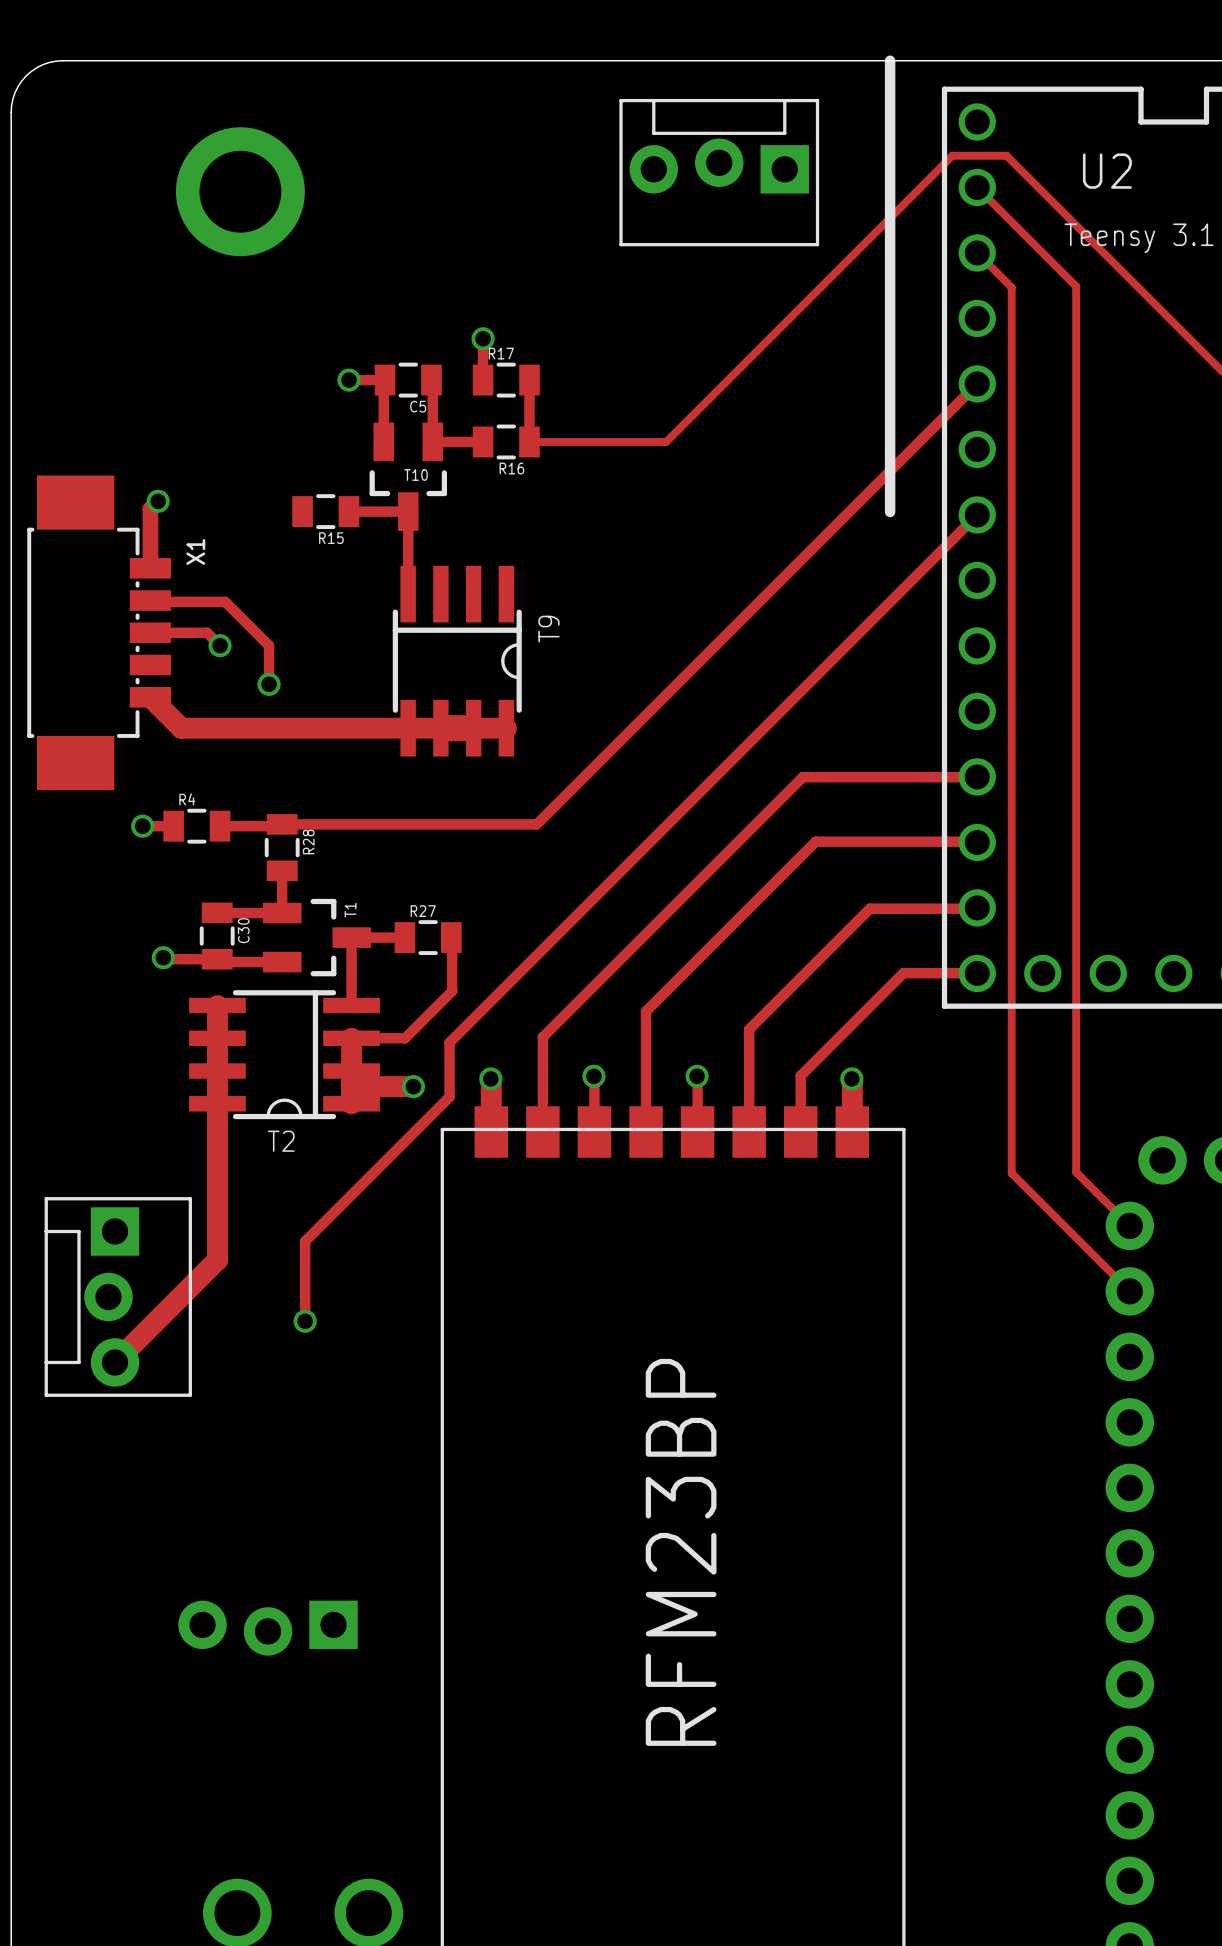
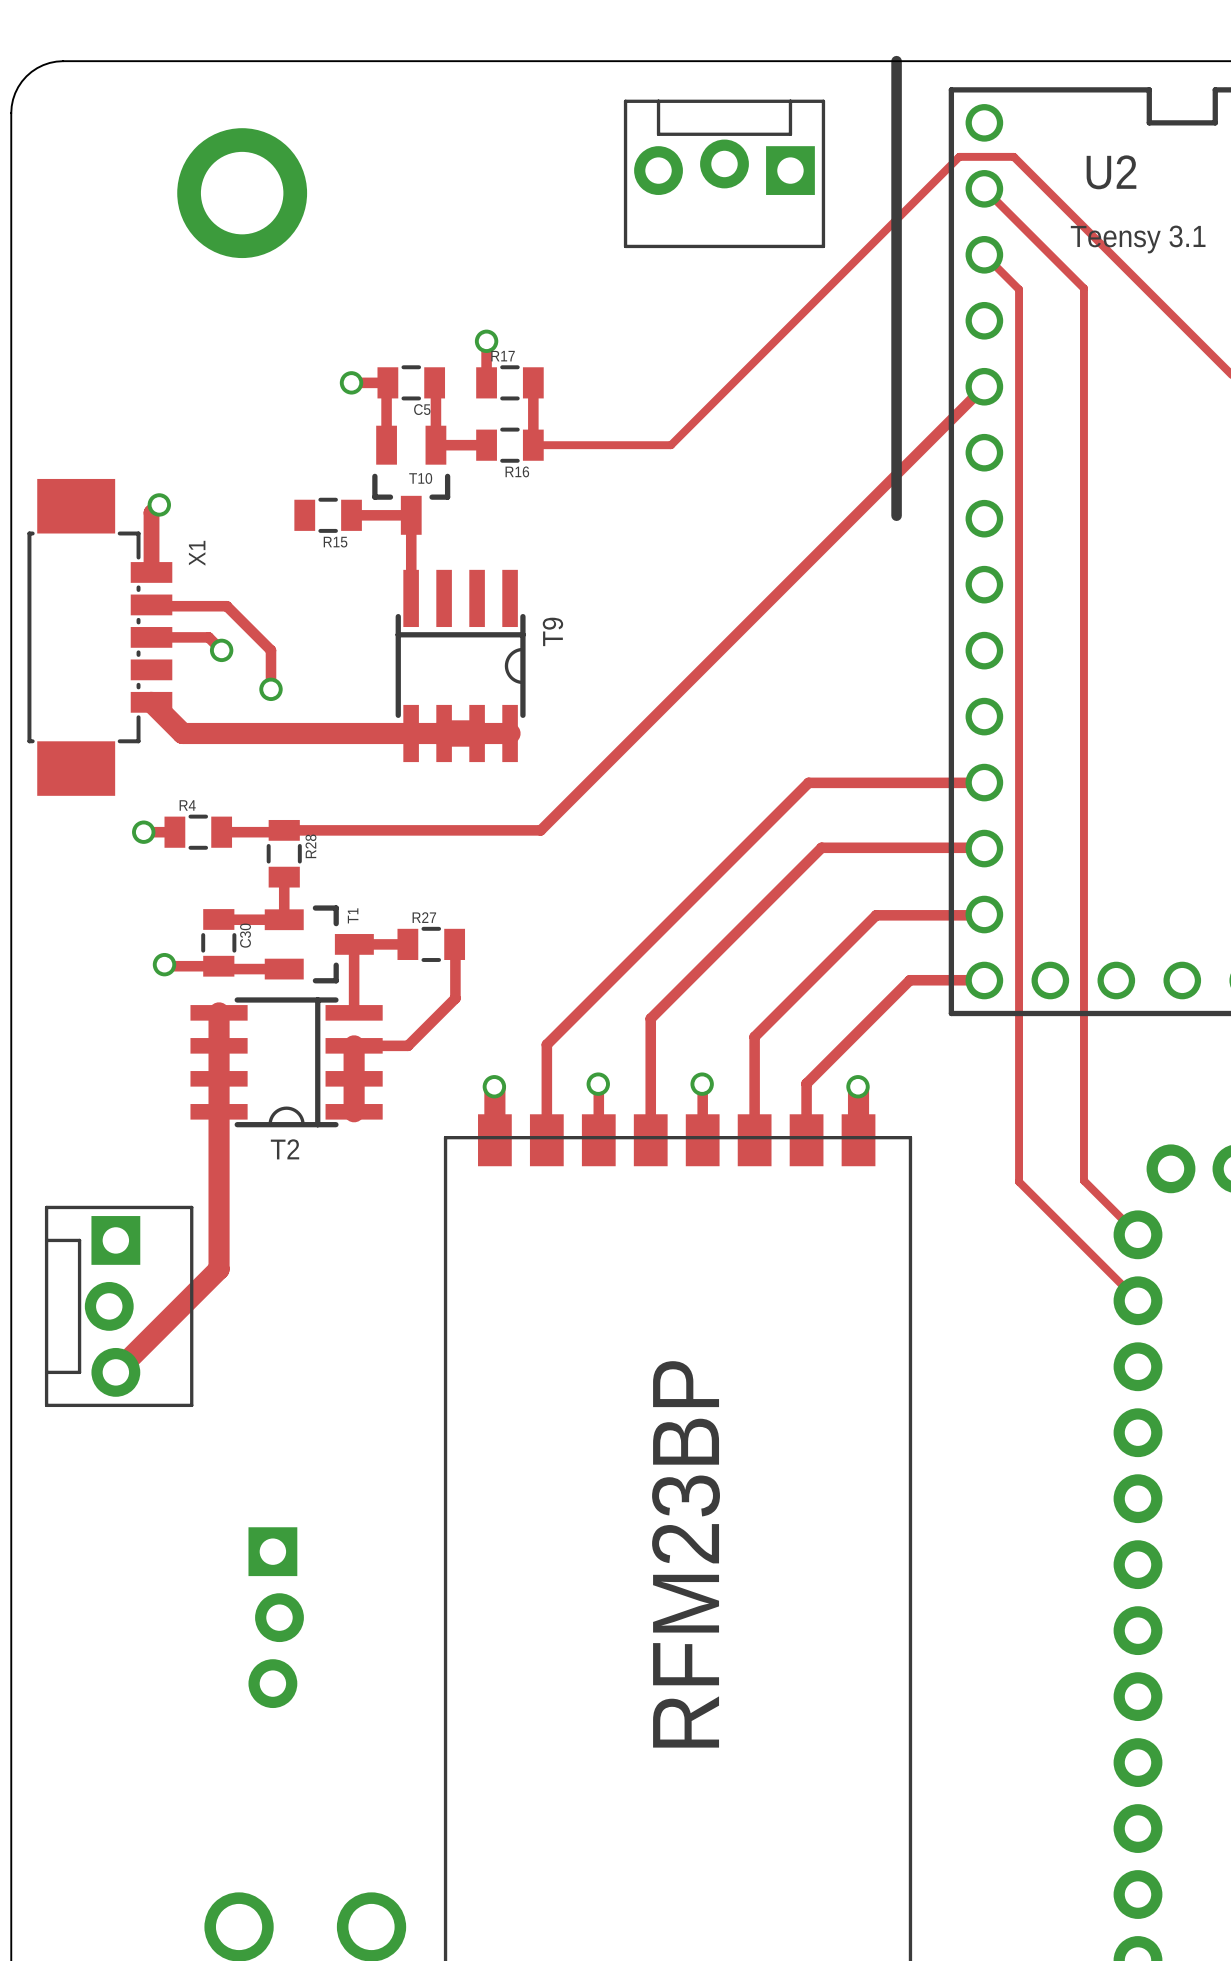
track: (977, 514) (449, 1042) (449, 1096) (305, 1241) (305, 1321) -> none
track: (351, 1086) (413, 1086) -> none
via: (413, 1086) -> none
via: (305, 1321) -> none
part rotation: 0° (268, 1628) -> 90° counterclockwise (276, 1617)

